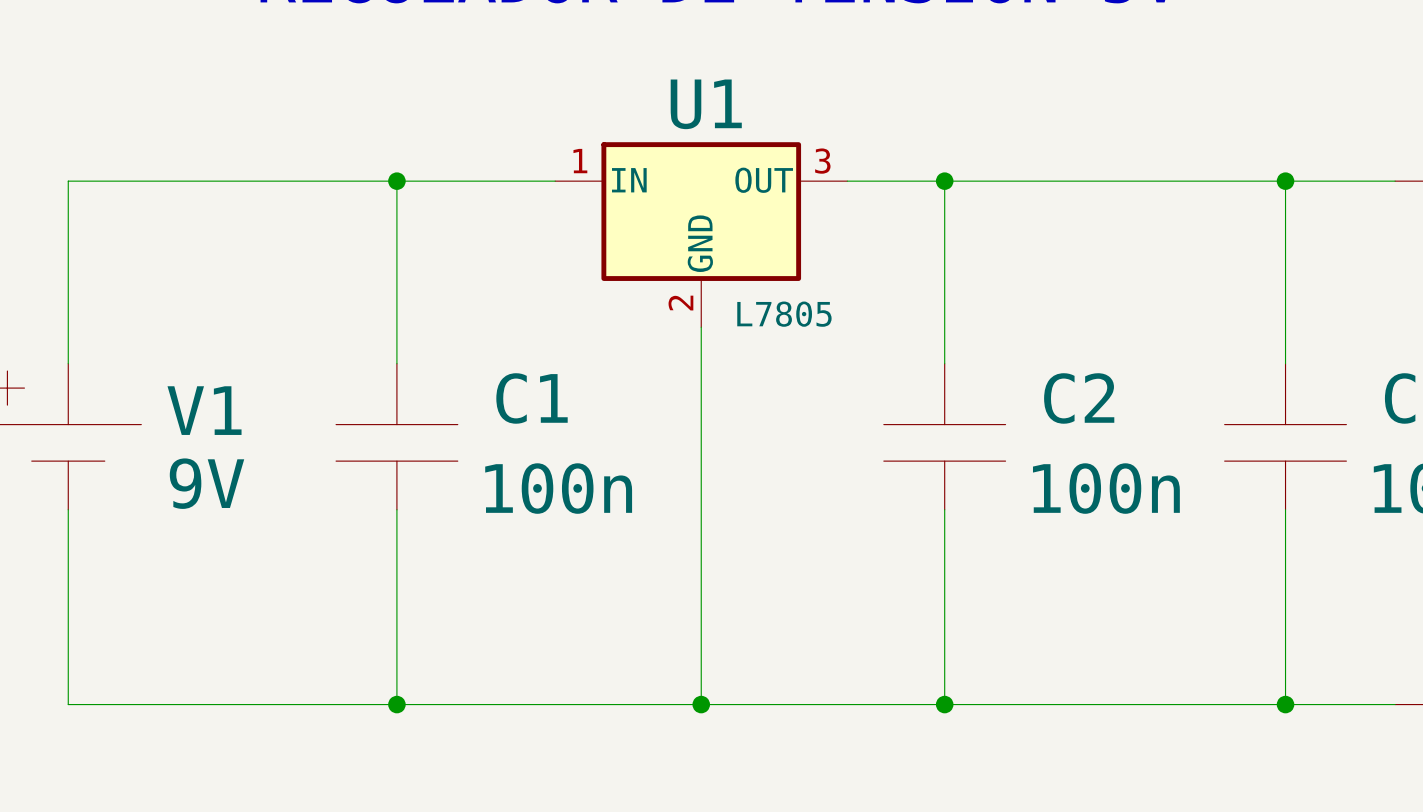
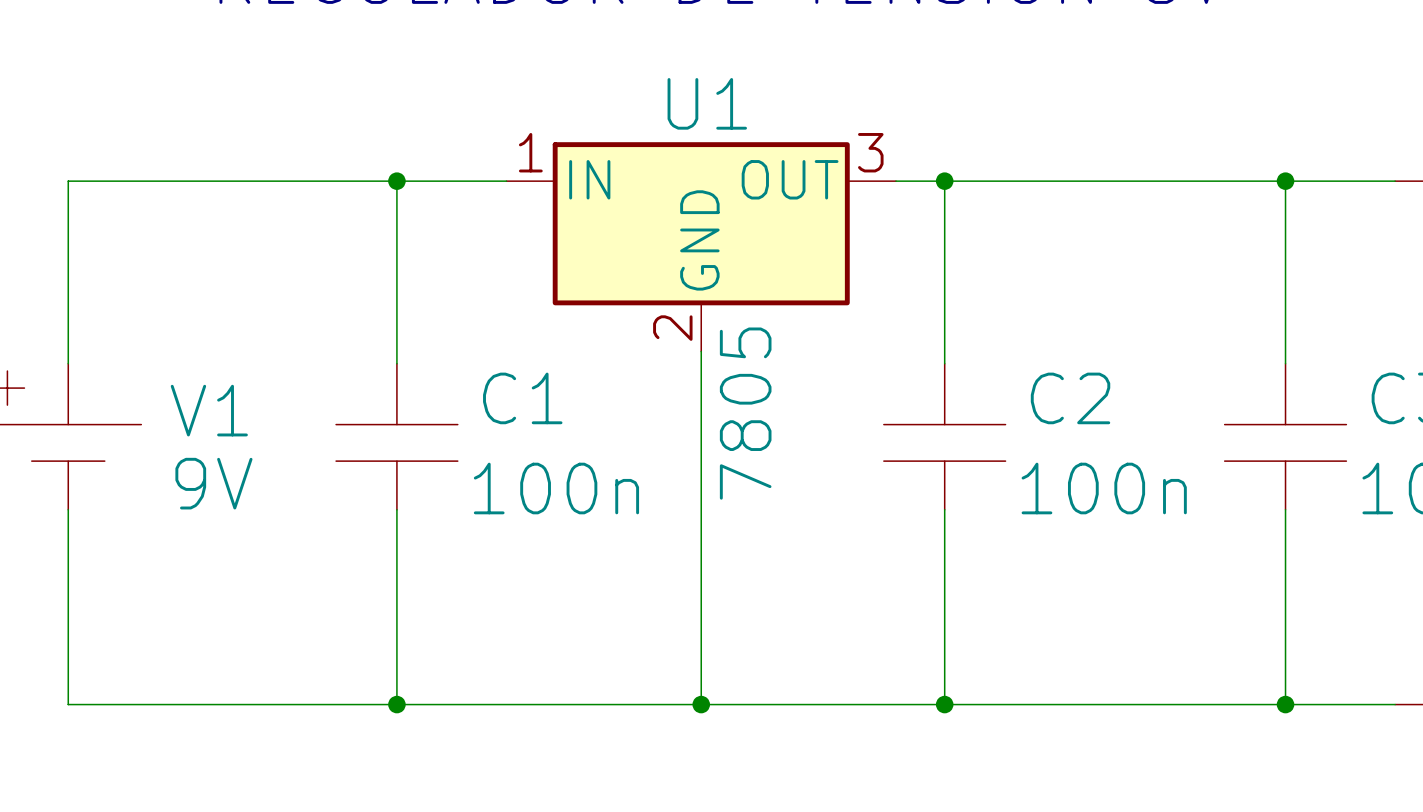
U1 symbol: [555, 142, 848, 328] -> [506, 142, 897, 352]
U1 value: L7805 (784, 314) -> 7805 (745, 413)

